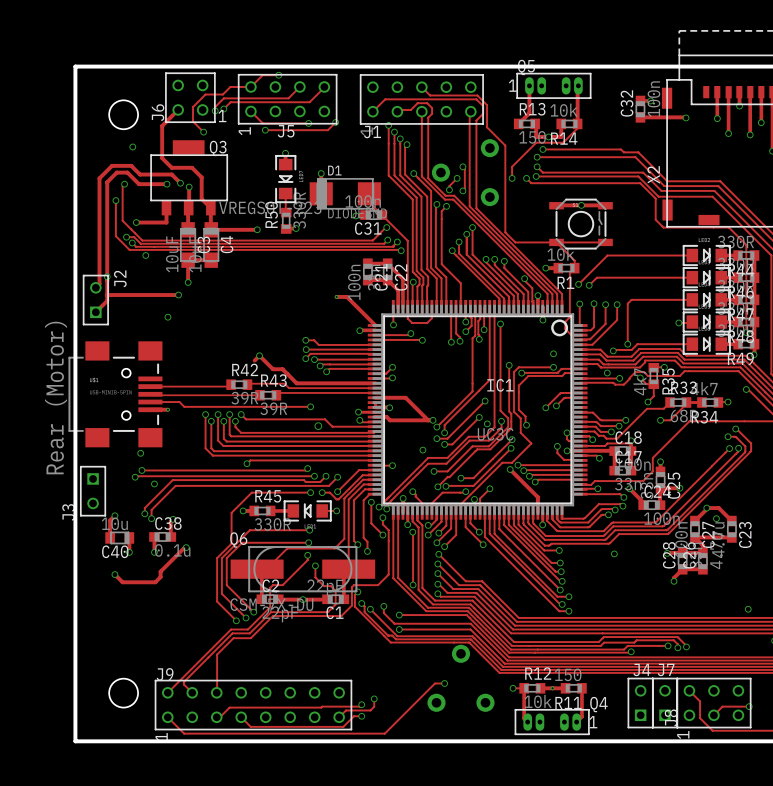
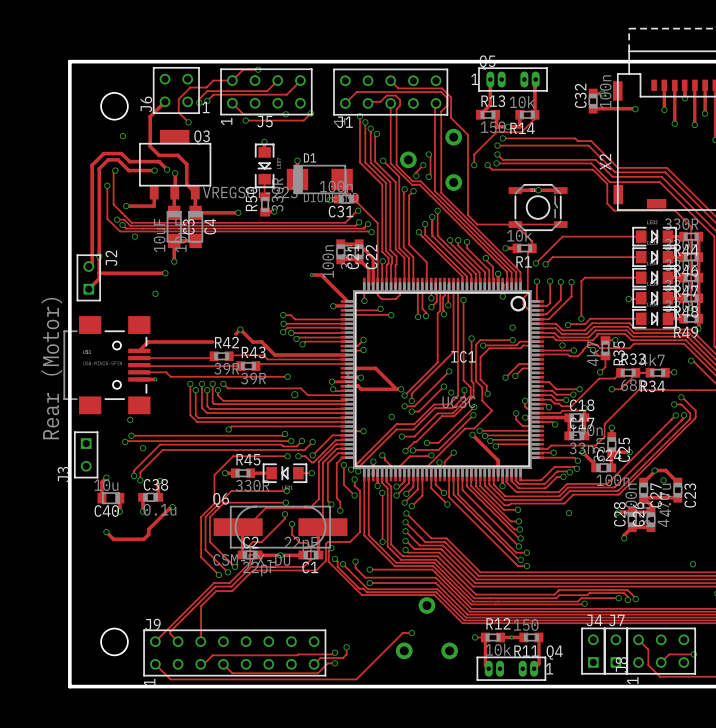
track: none -> (212, 341) (148, 341) (139, 350)

